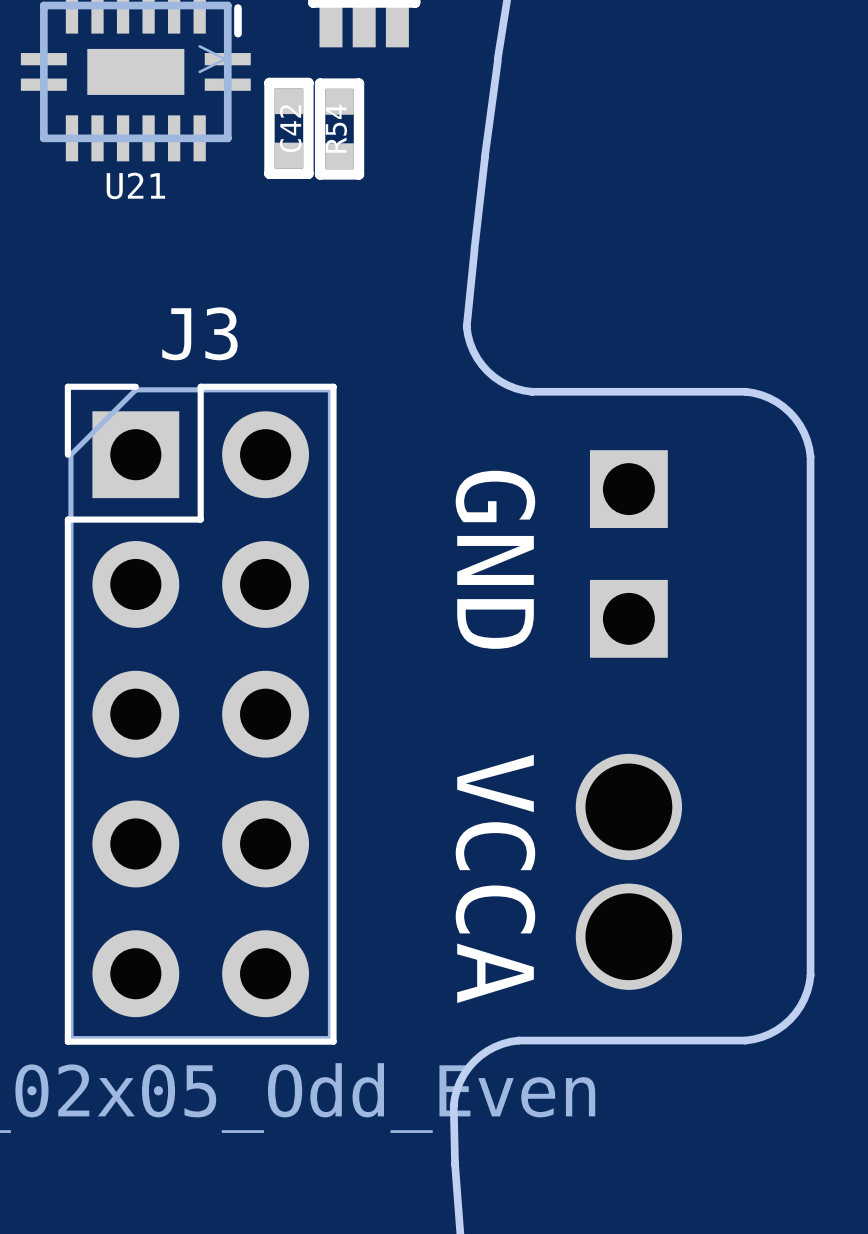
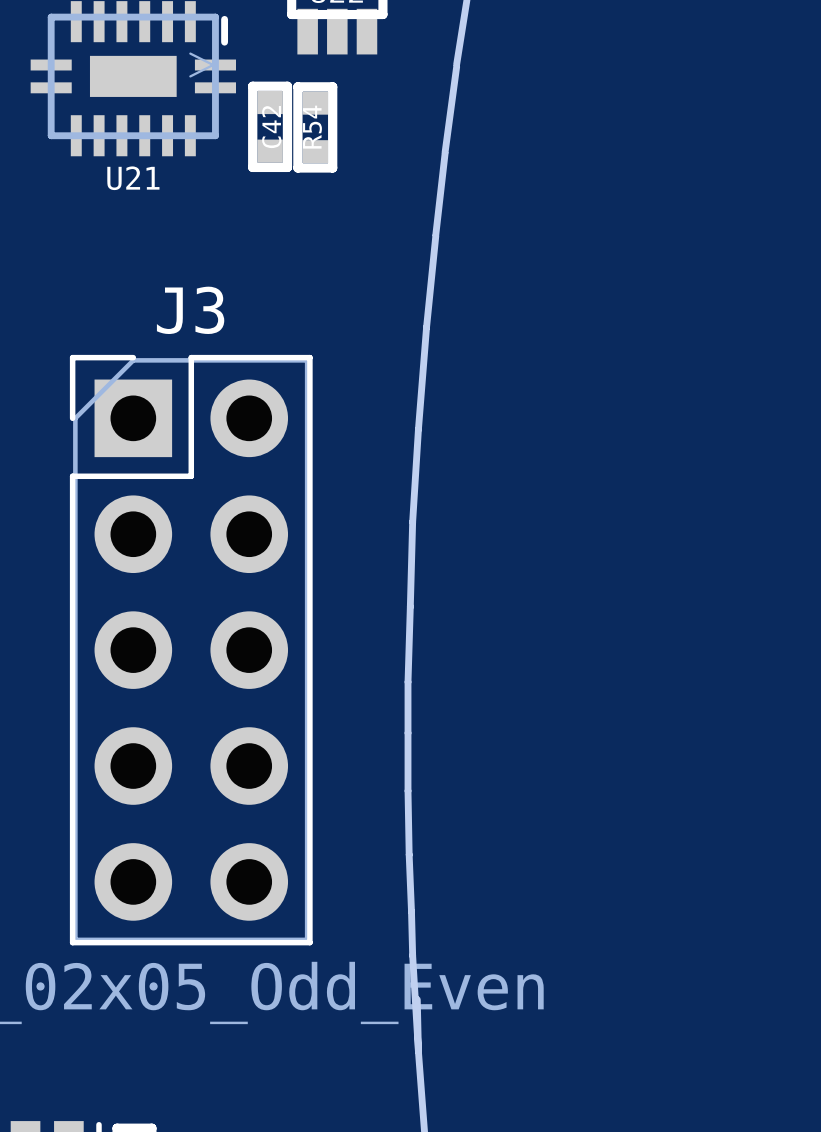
board edge: (474, 250) (466, 326) (473, 350) (487, 371) (500, 381) (515, 388) (532, 391) -> (435, 235) (426, 327) (412, 522) (408, 682) (409, 854) (418, 1051)
board edge: (531, 391) (745, 391) -> none
board edge: (745, 391) (769, 398) (789, 412) (804, 432) (810, 456) (810, 975) -> none
part: (628, 489) -> none
text: GND (495, 559) -> none
part: (628, 618) -> none
part: (628, 806) -> none
text: VCCA (495, 878) -> none
part: (628, 936) -> none
board edge: (810, 975) (804, 999) (795, 1013) (777, 1030) (753, 1039) (518, 1040) -> none
board edge: (518, 1040) (494, 1047) (474, 1061) (460, 1081) (453, 1105) -> none

